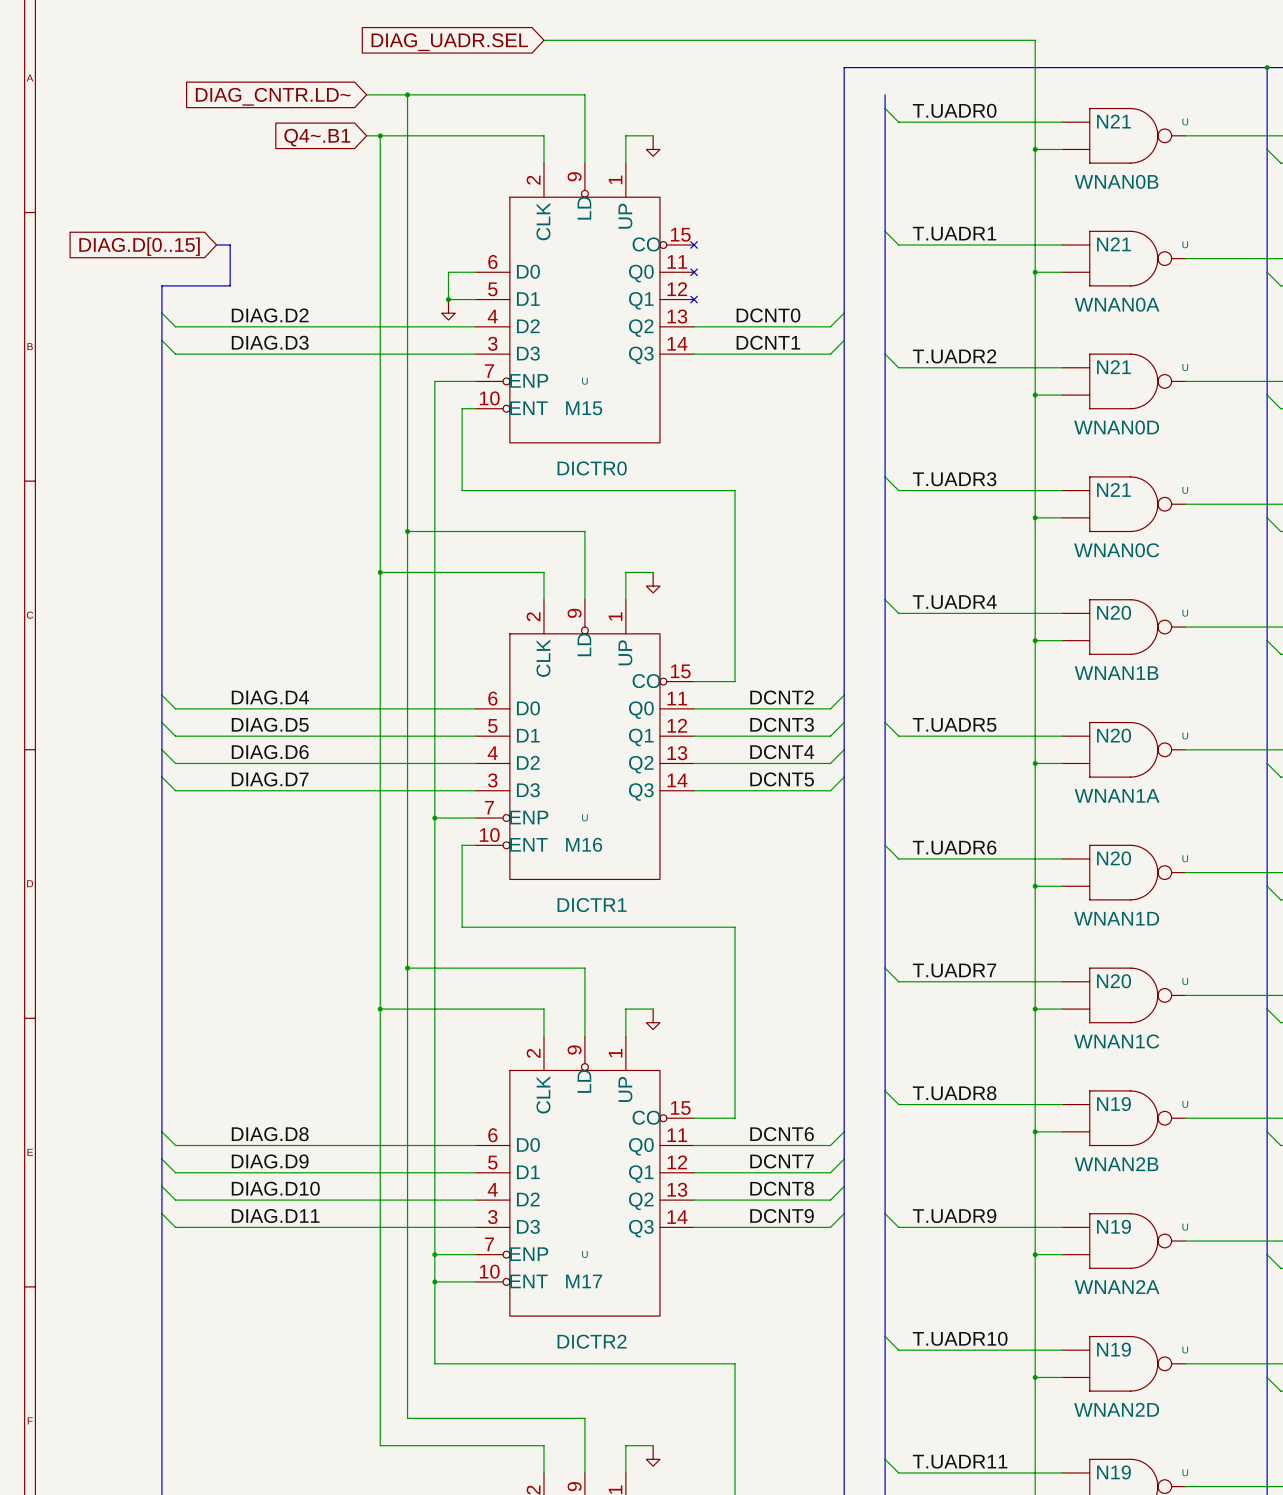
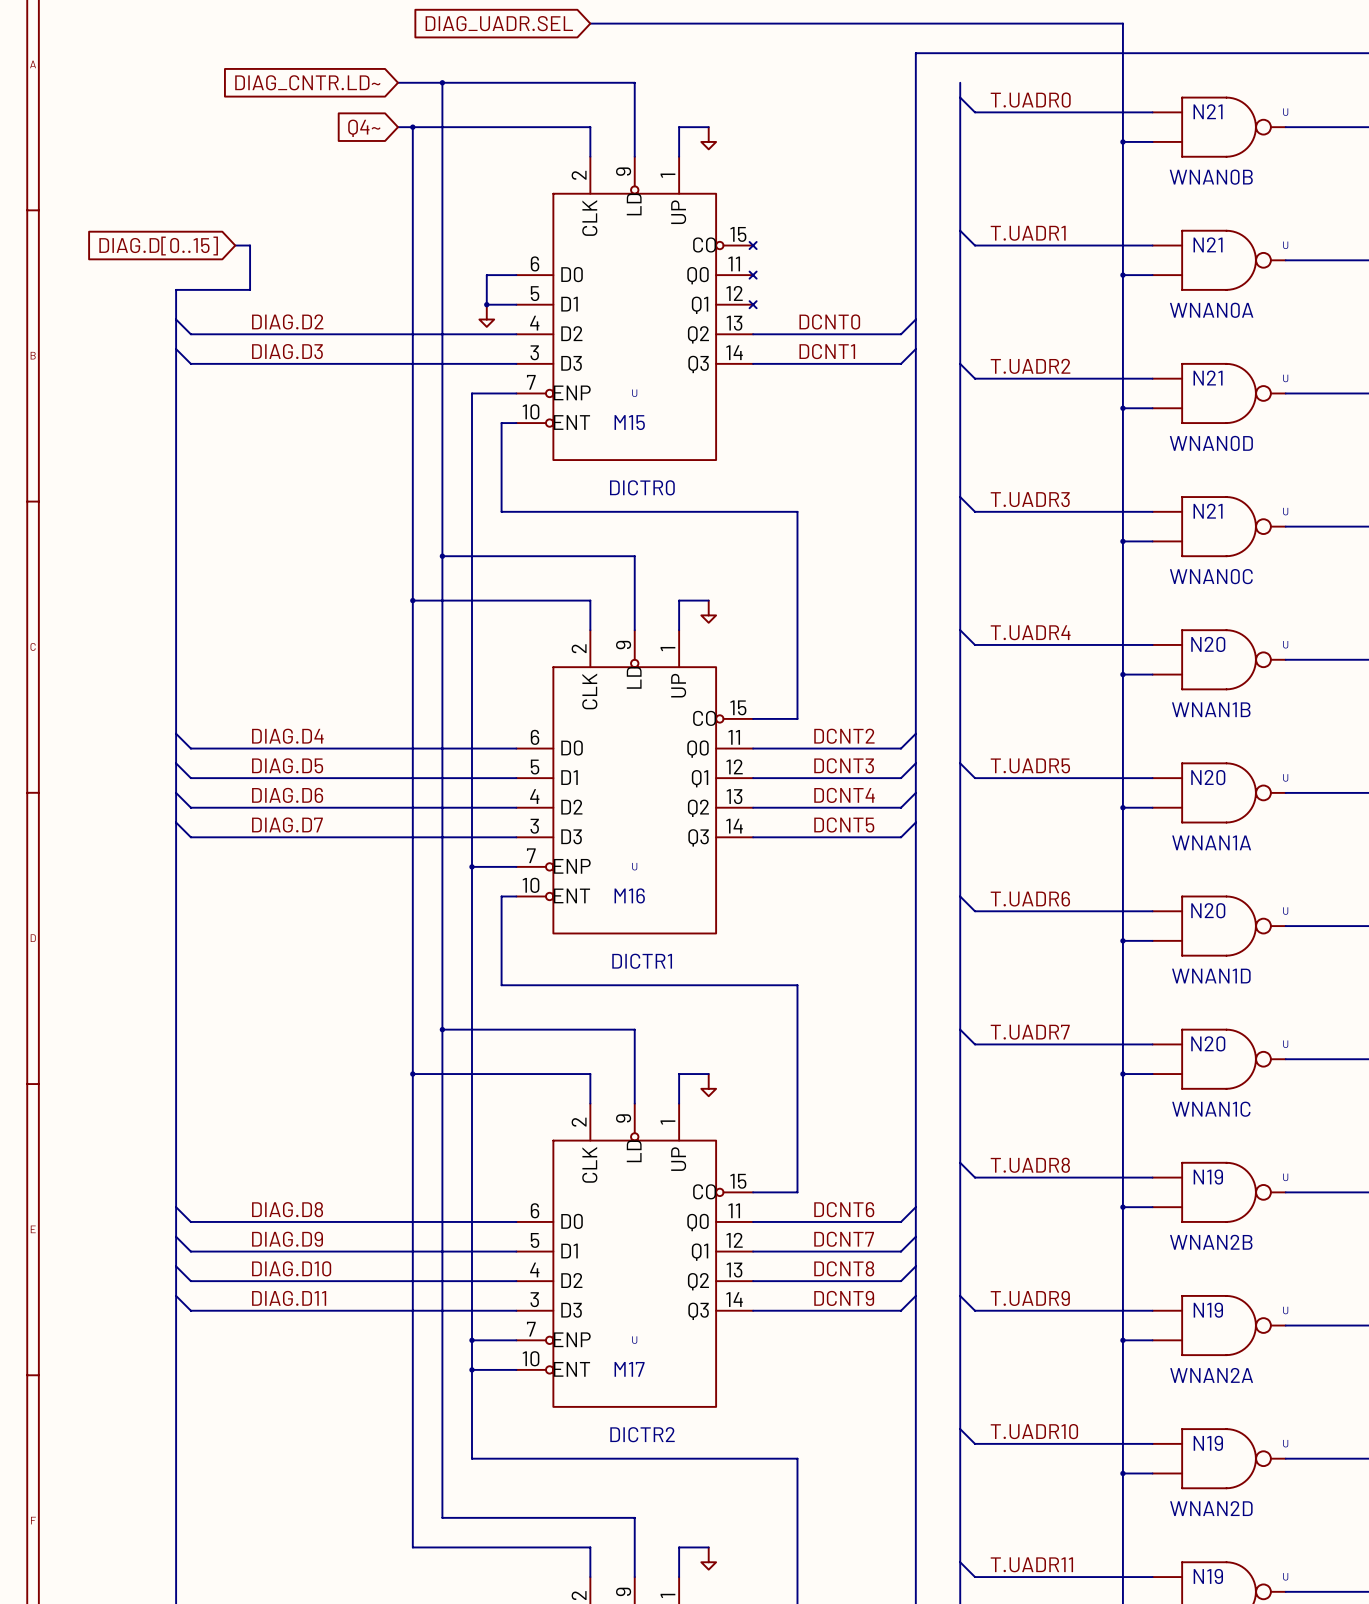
global label: Q4~.B1 (317, 137) -> Q4~ (364, 128)

